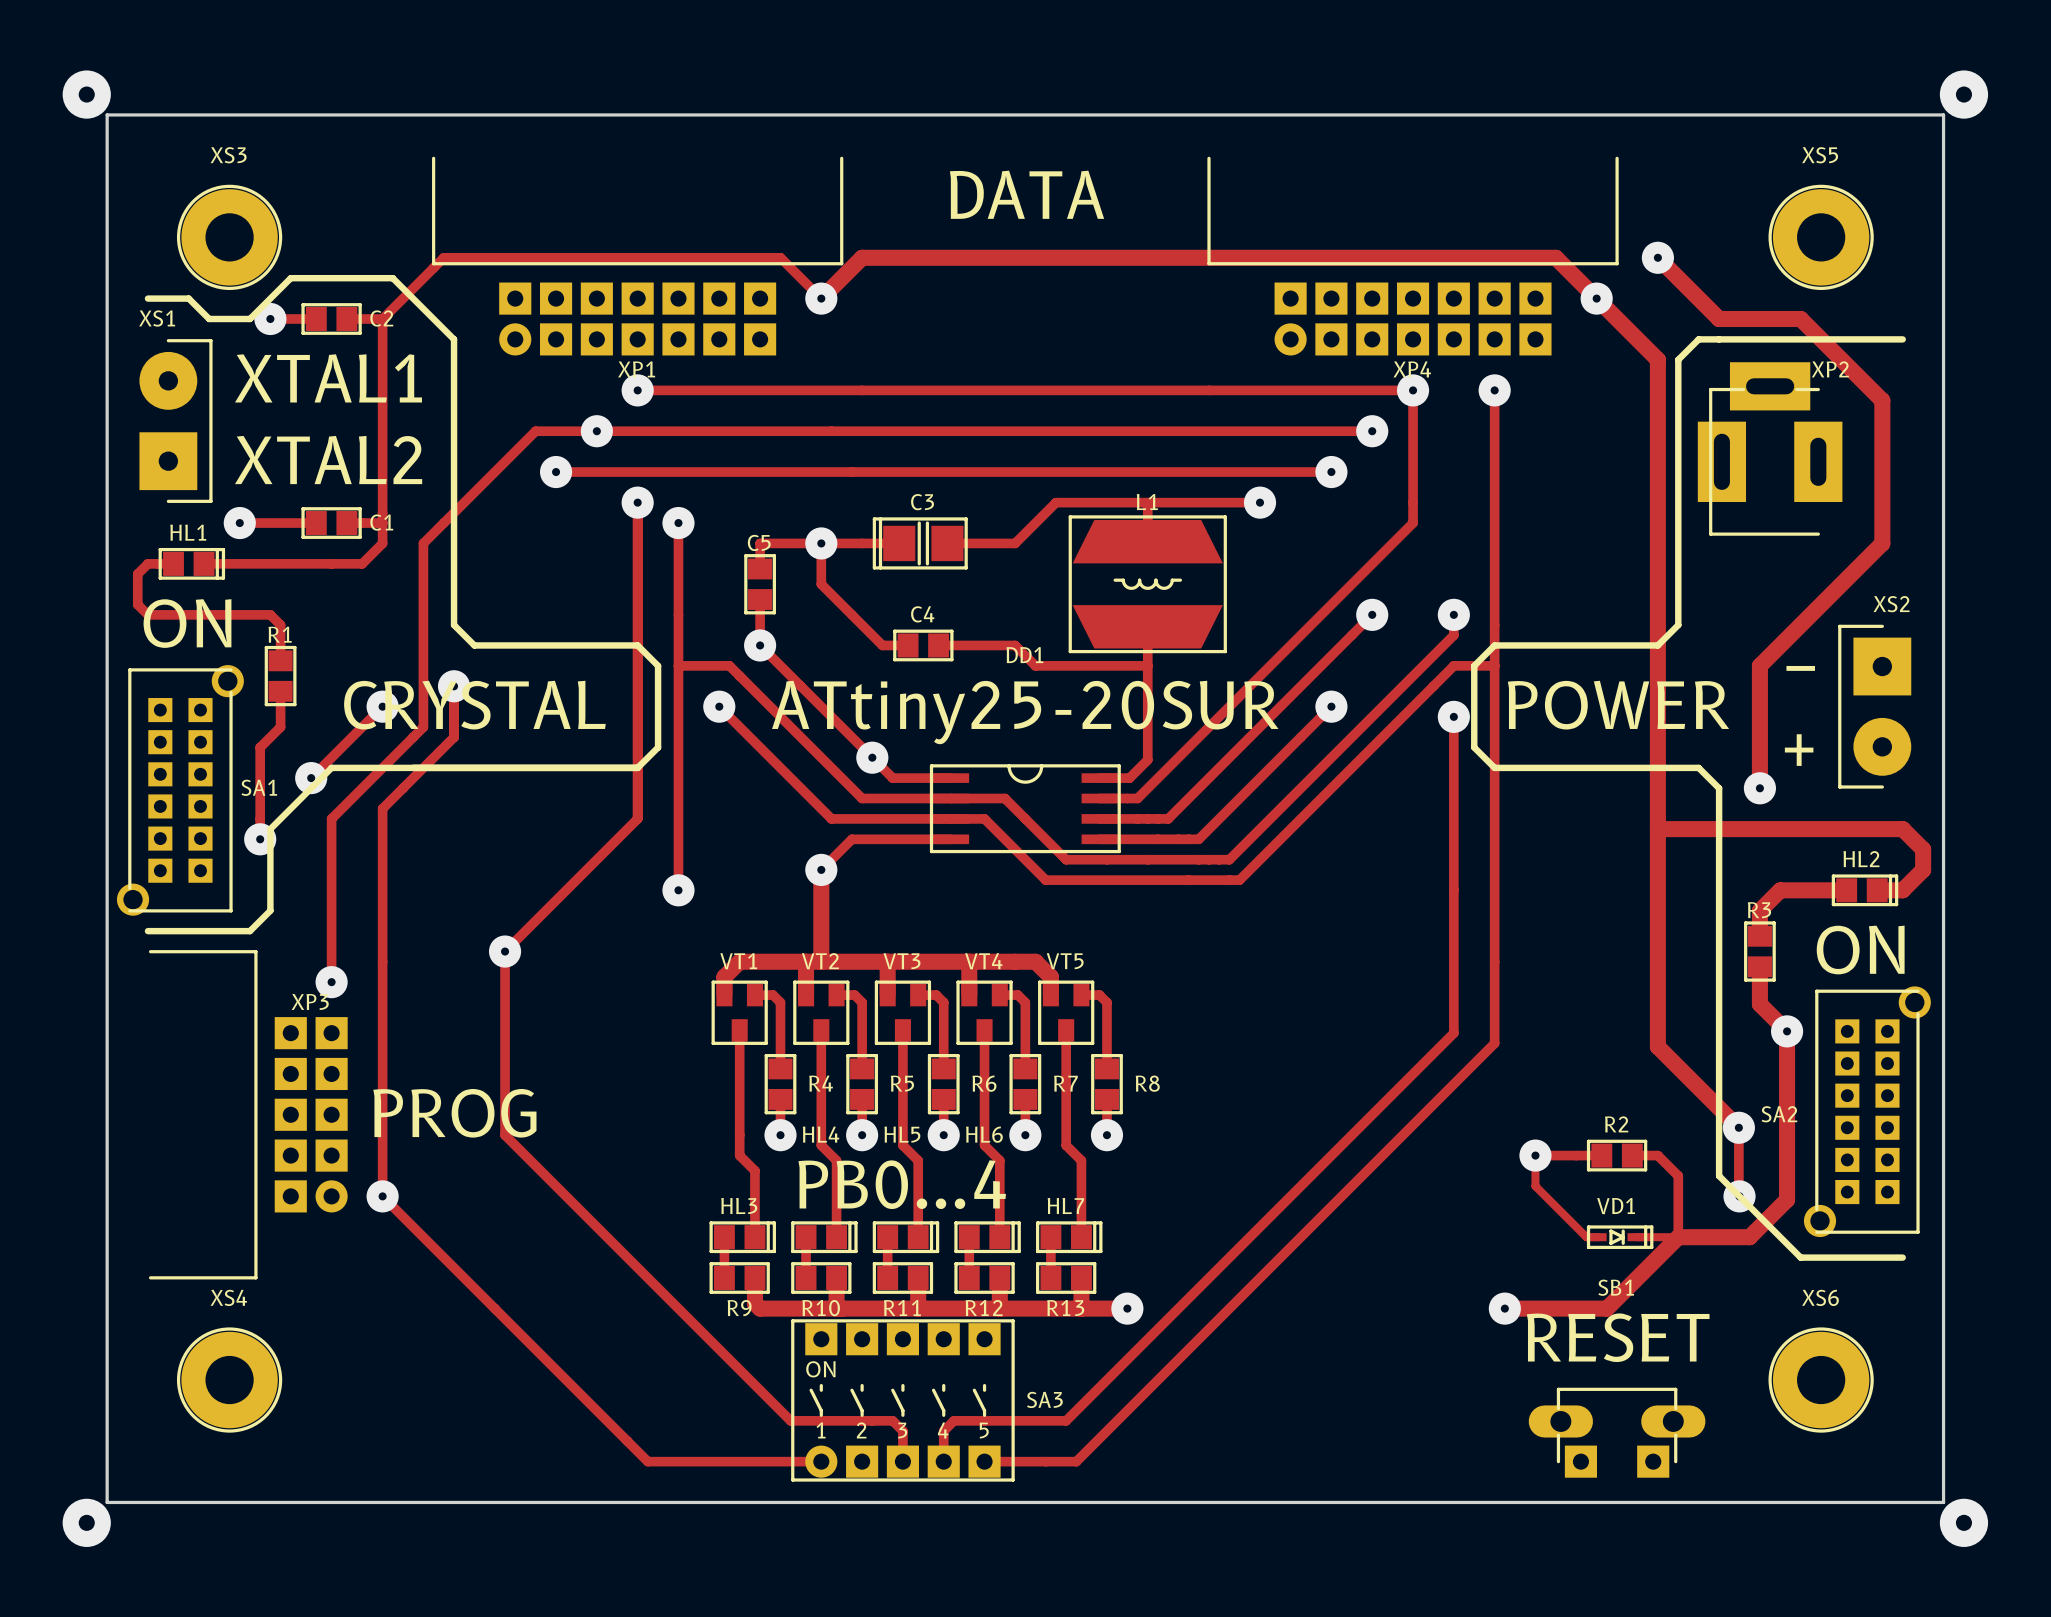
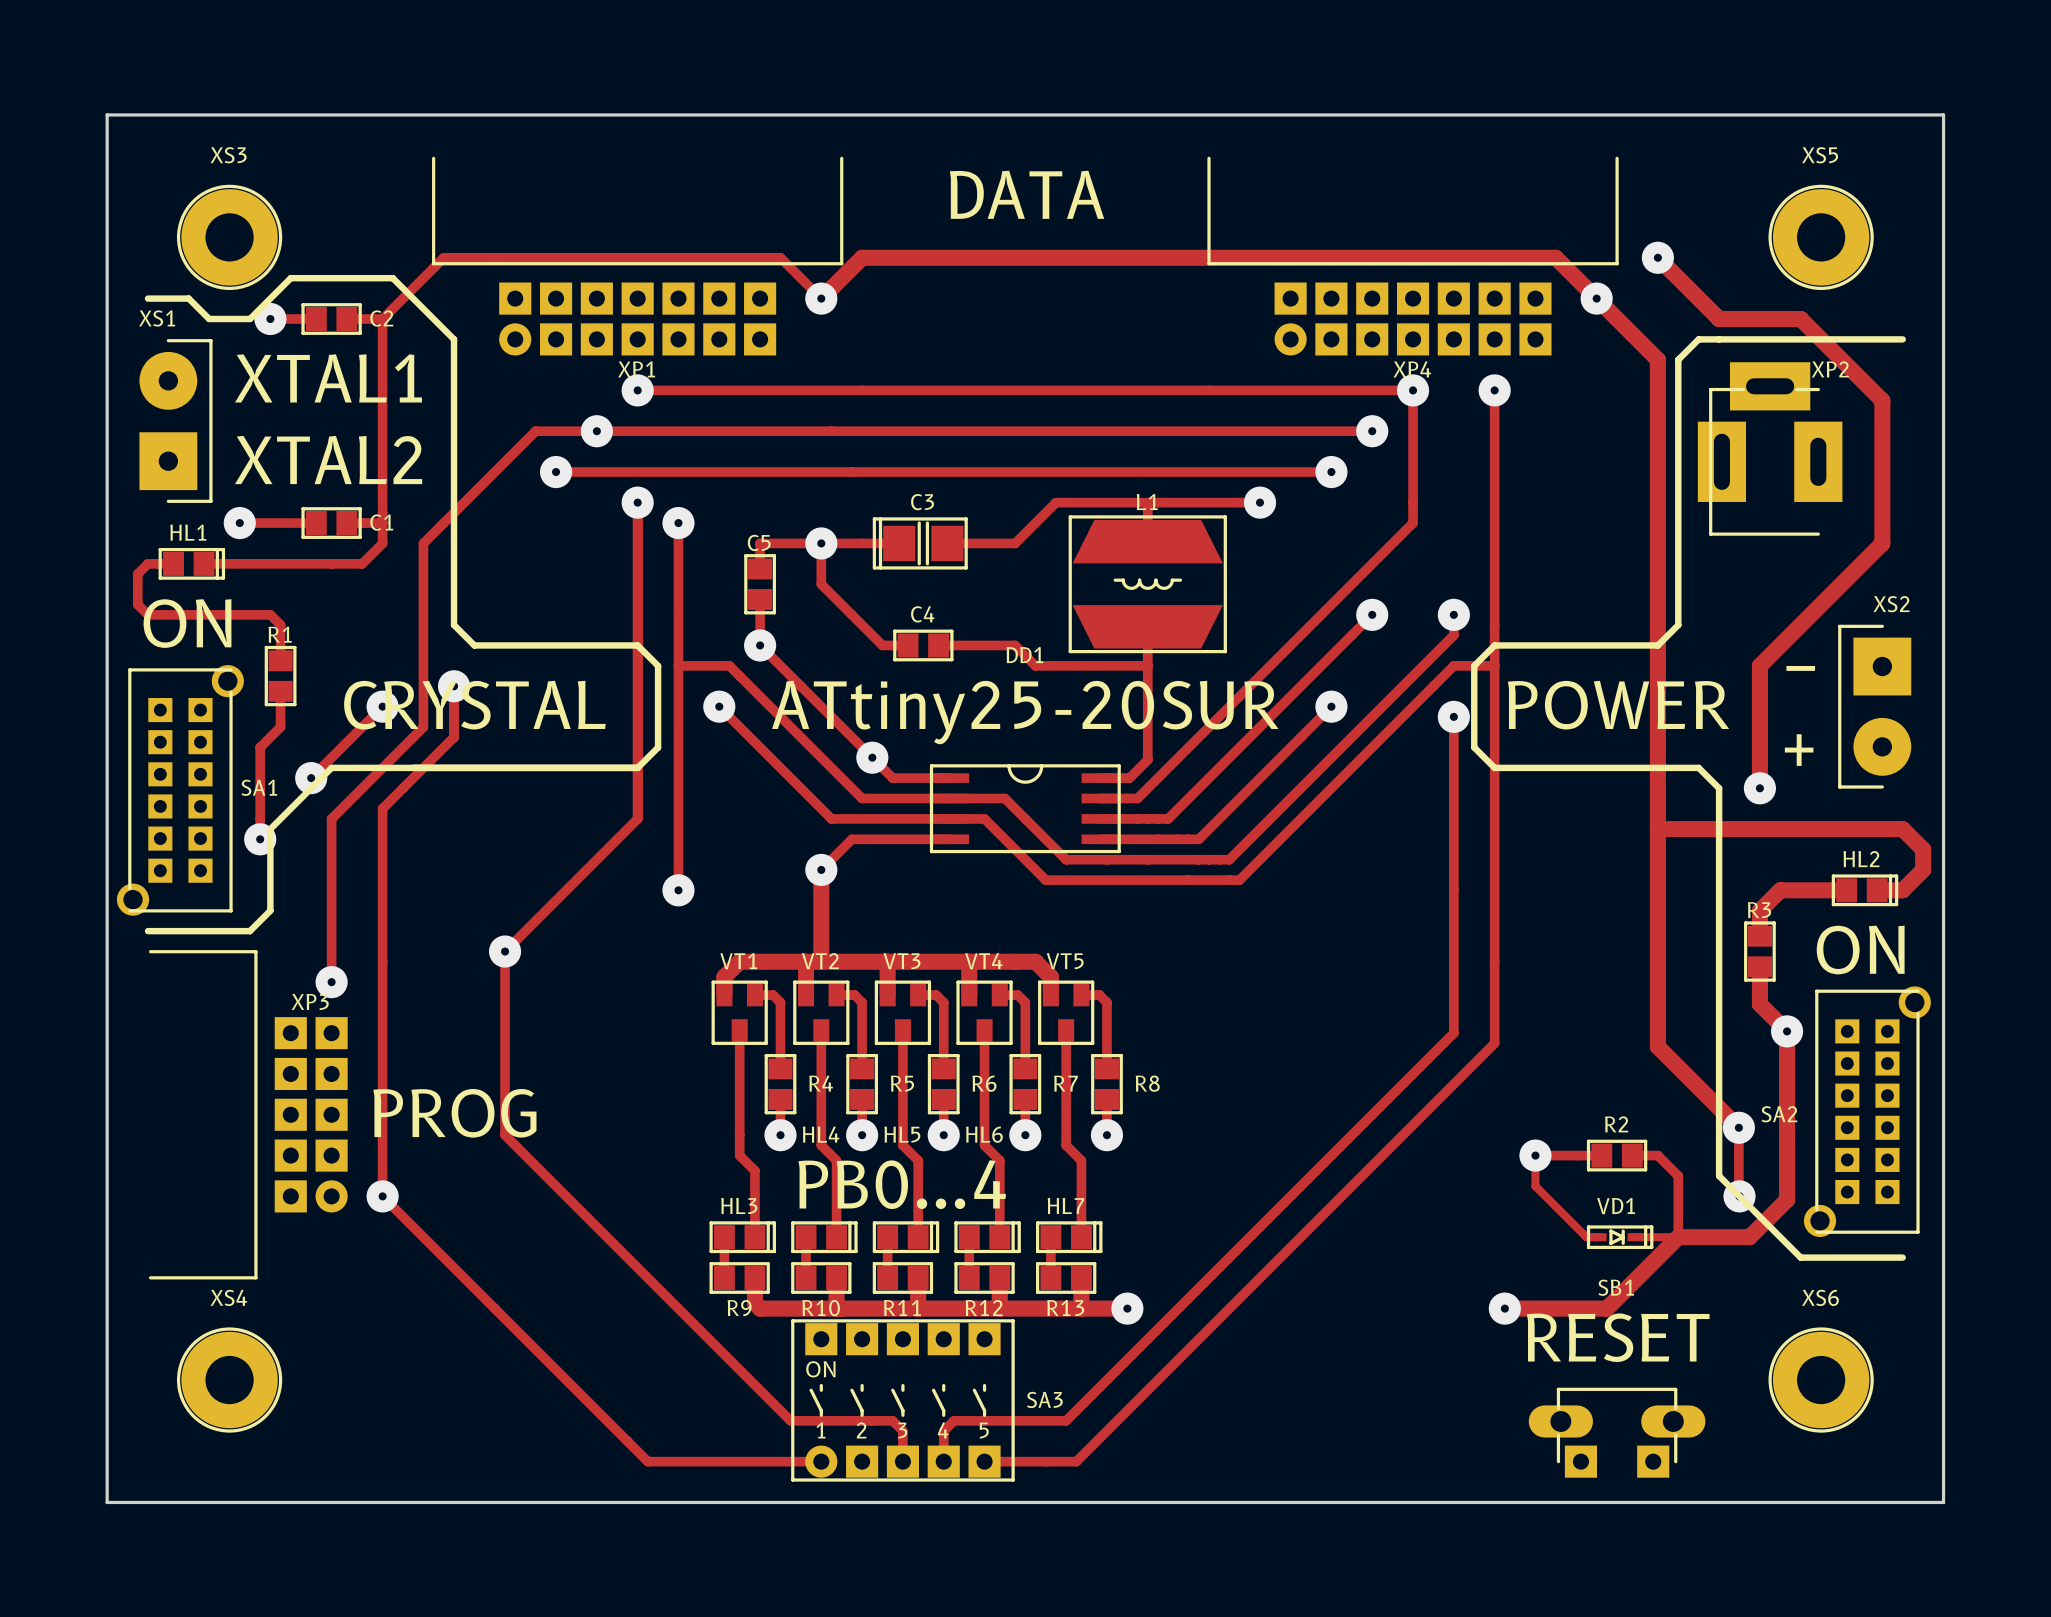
via: (86, 94) -> none
via: (1963, 94) -> none
via: (86, 1522) -> none
via: (1963, 1522) -> none

